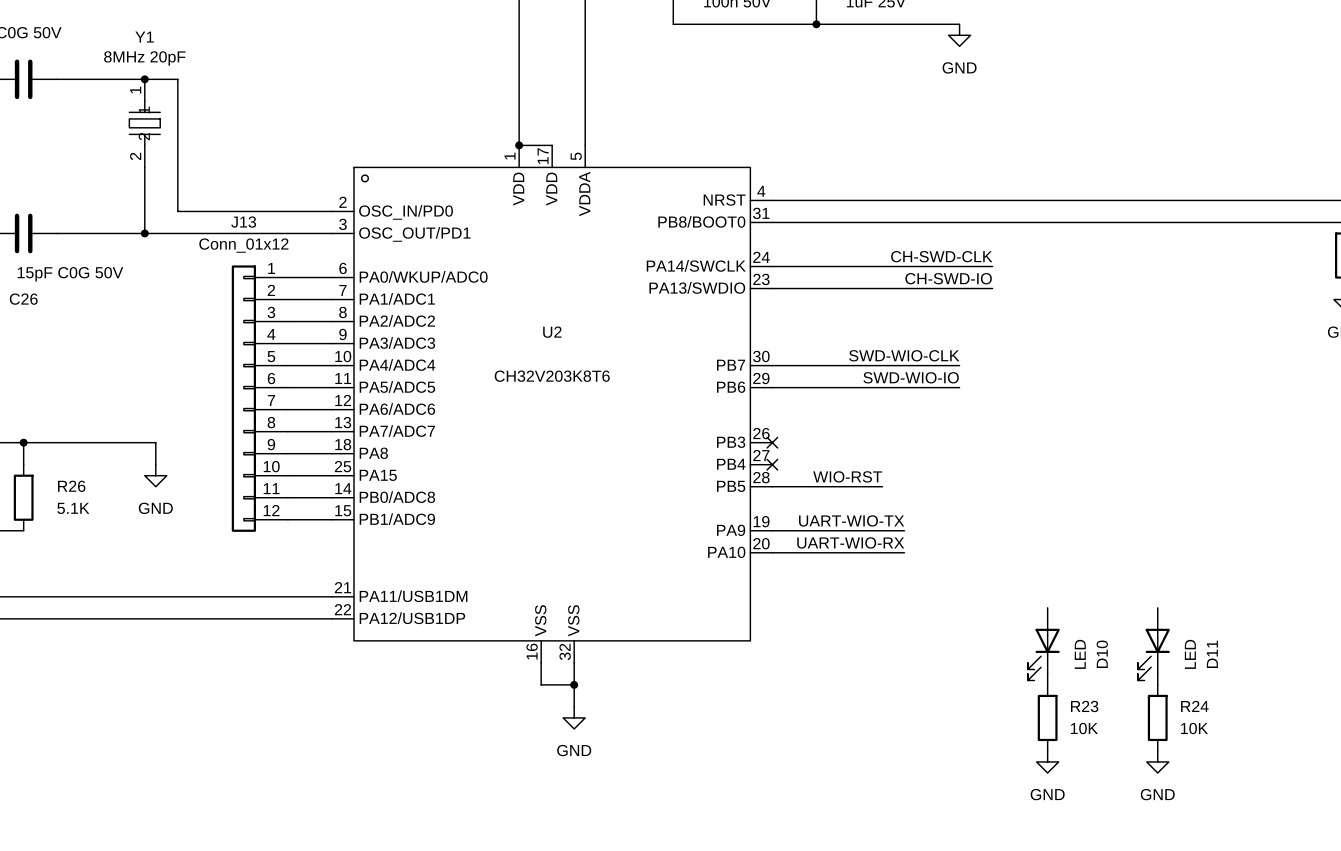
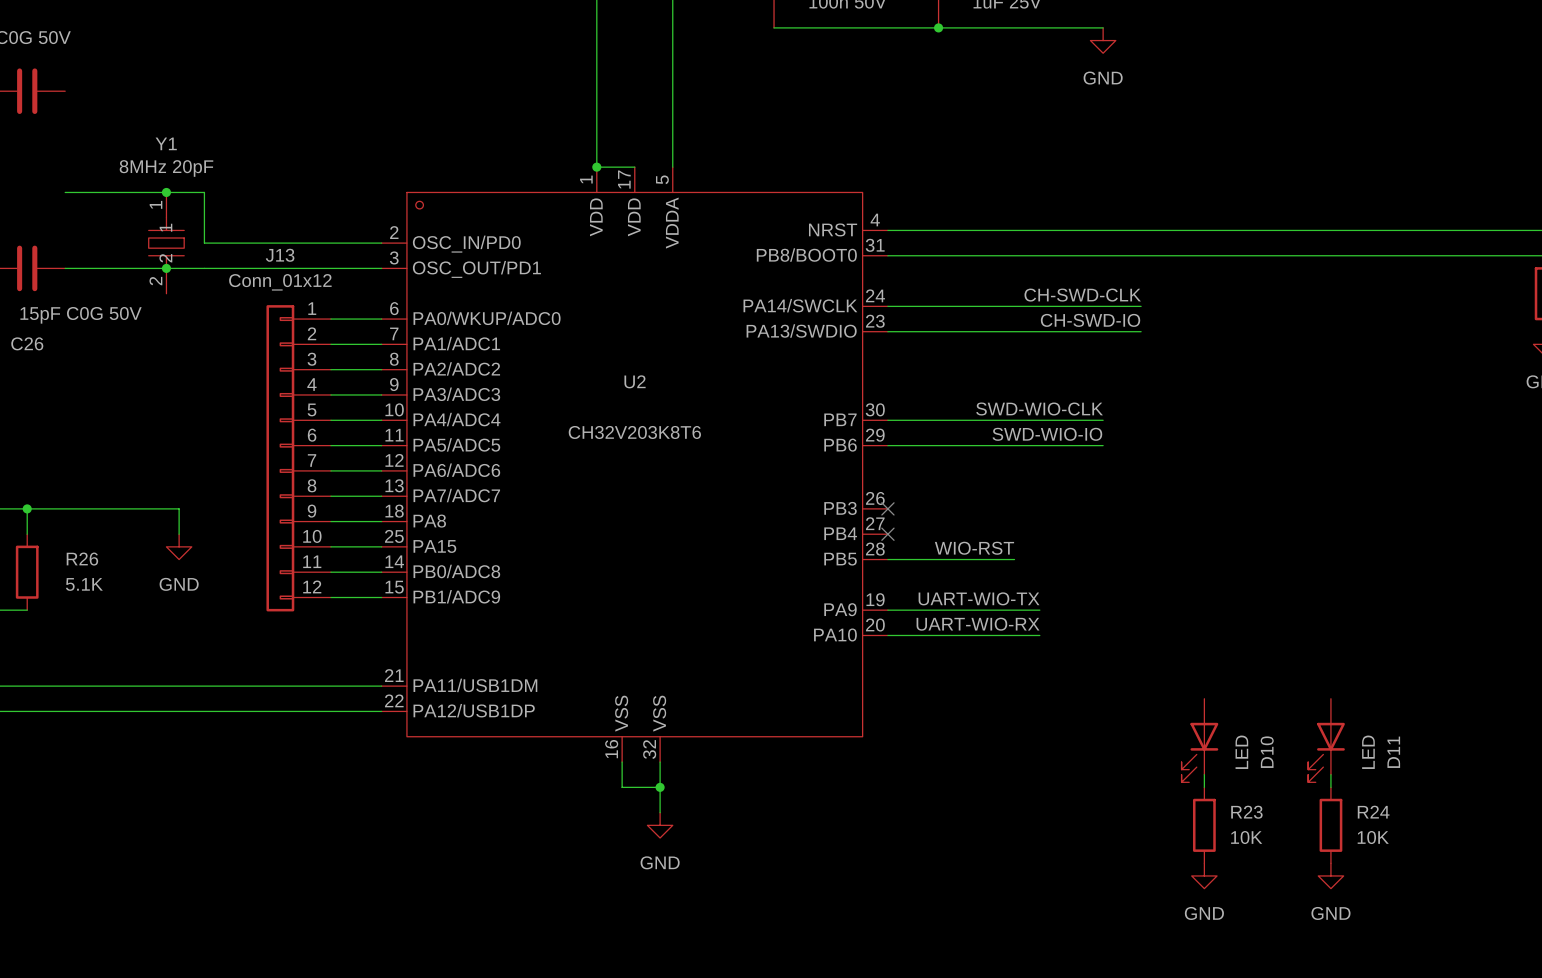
wire: (56, 79) (177, 79) (177, 167) -> (65, 192) (204, 192)
junction: (144, 79) -> none
Y1 position: (144, 123) -> (166, 243)
junction: none -> (166, 192)

